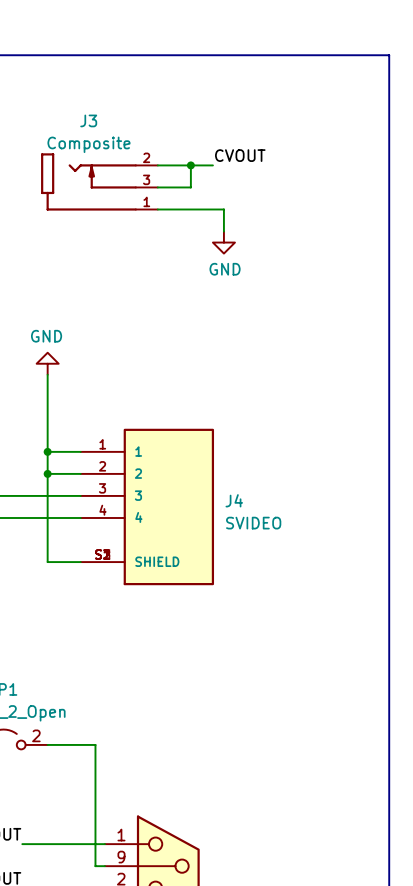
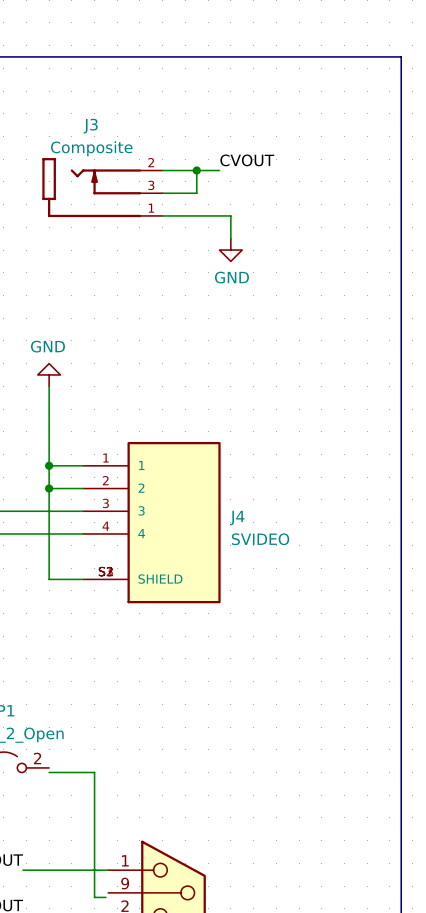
wire: (47, 744) (95, 744) (95, 866) (104, 866) -> none
wire: none -> (49, 772) (94, 772) (94, 897) (105, 897)

